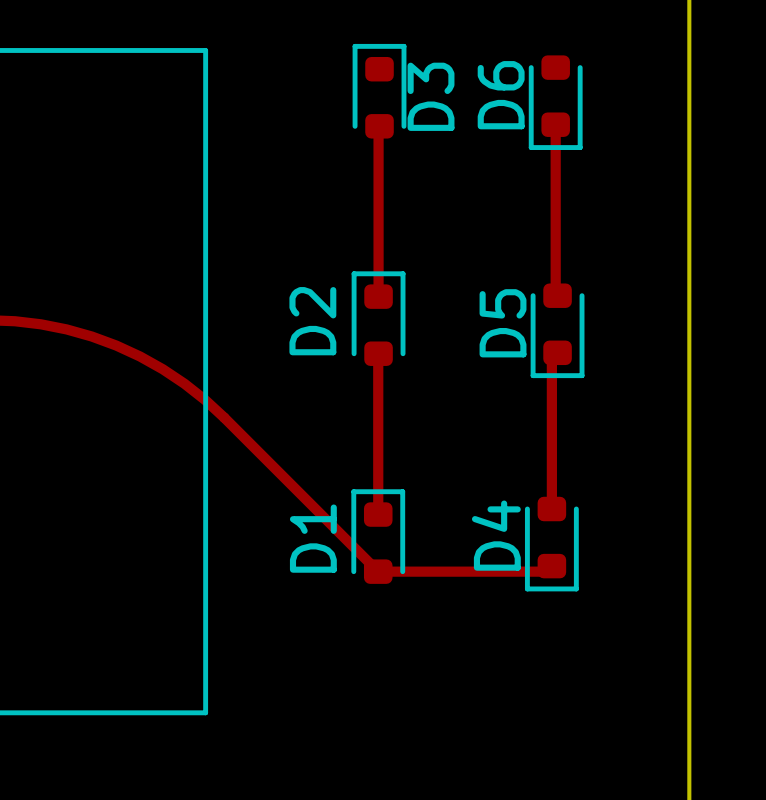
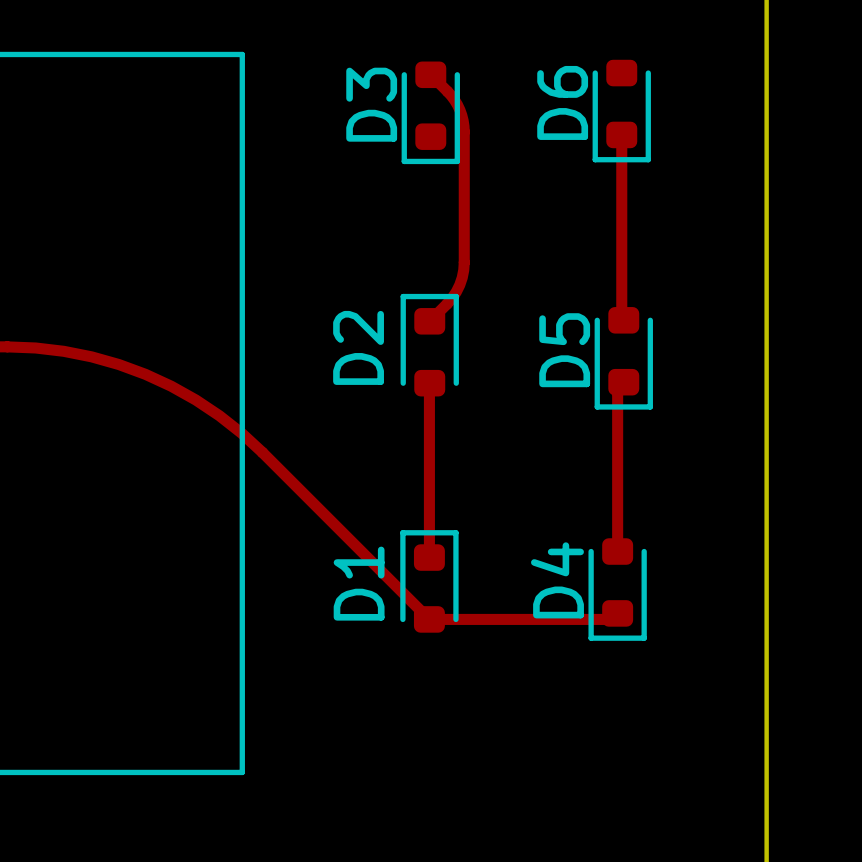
D3 rotation: 0° (379, 91) -> 180° (430, 112)
top track: (379, 126) (378, 296) -> (430, 74) (454, 100) (463, 120) (464, 262) (462, 277) (456, 291) (429, 321)

